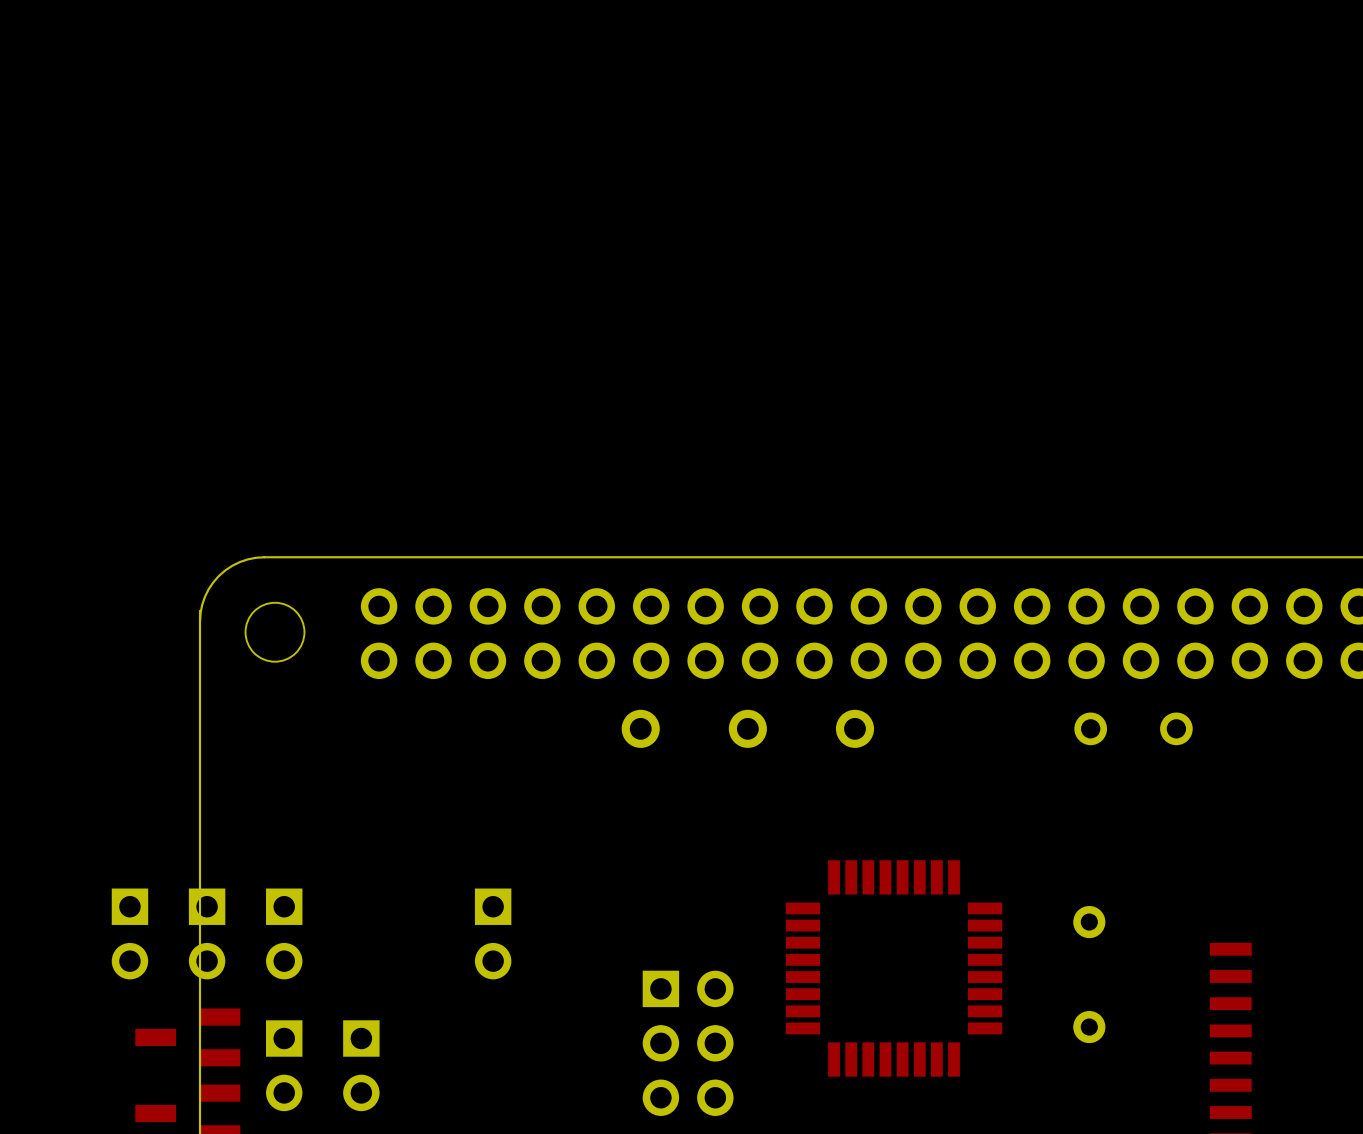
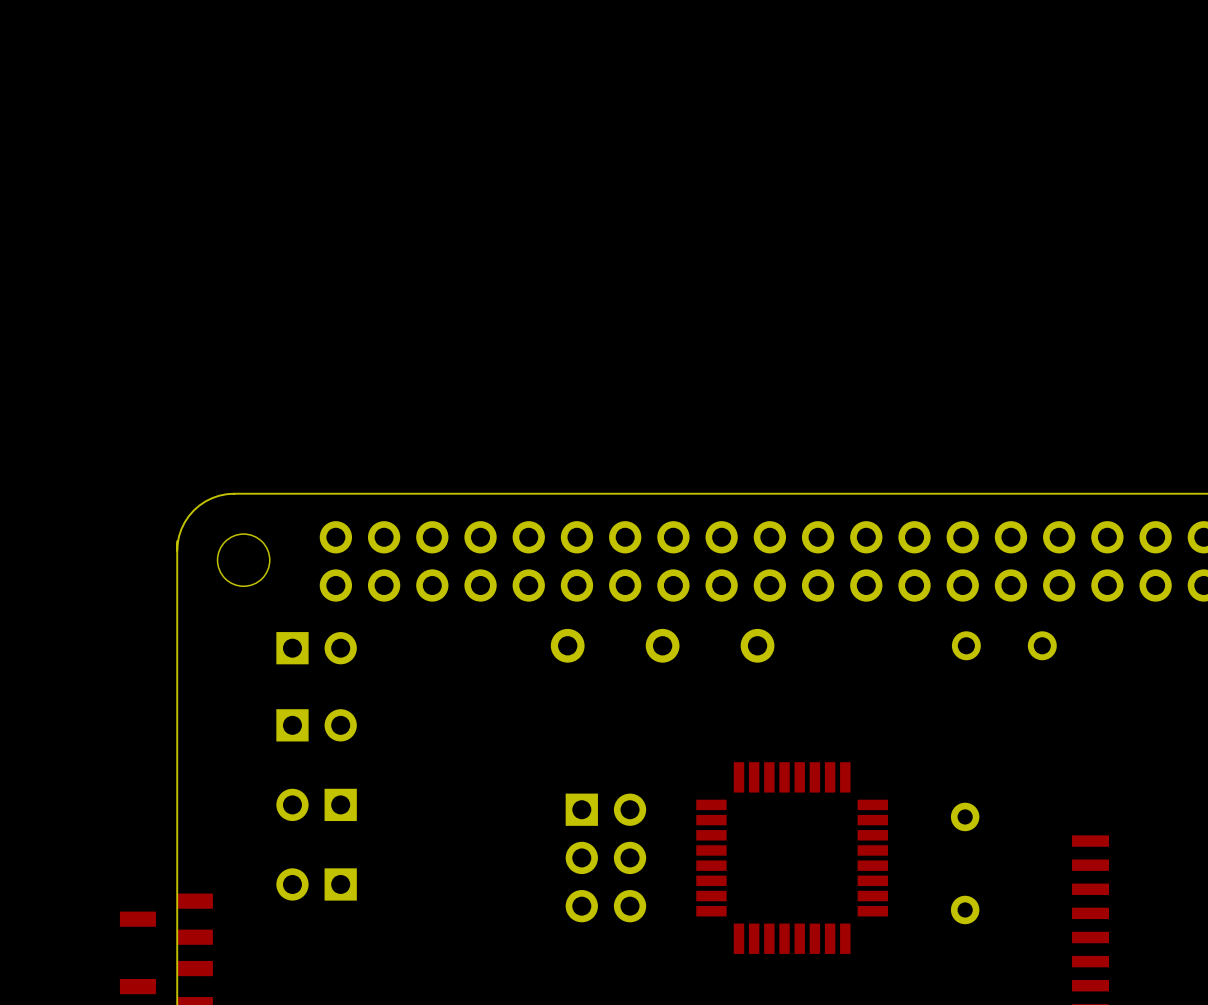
part: none -> (316, 648)
part: none -> (316, 725)
part: none -> (316, 804)
part: (129, 933) -> none
part: (207, 933) -> none
part: (284, 933) -> none
part: (493, 933) -> none
part: none -> (316, 884)
part position: (688, 1043) -> (605, 857)
part: (284, 1065) -> none
part: (361, 1065) -> none

